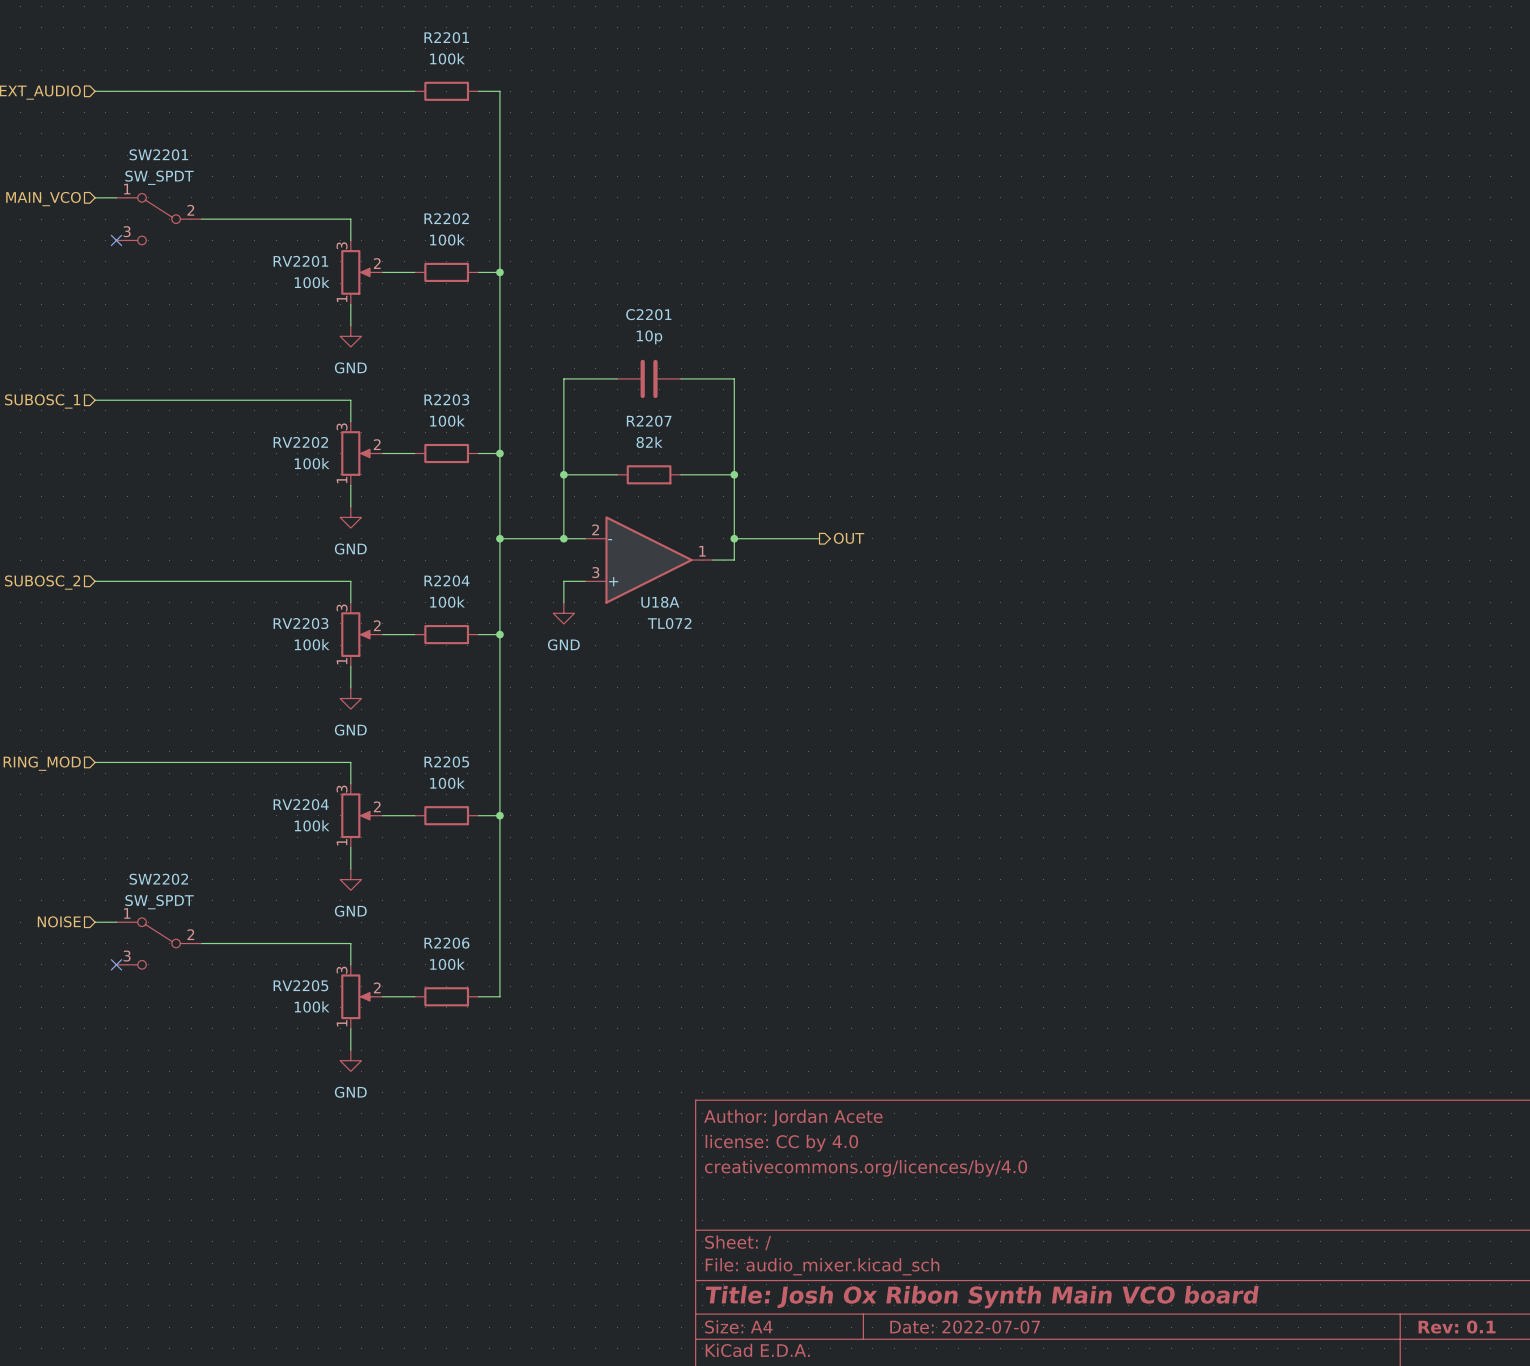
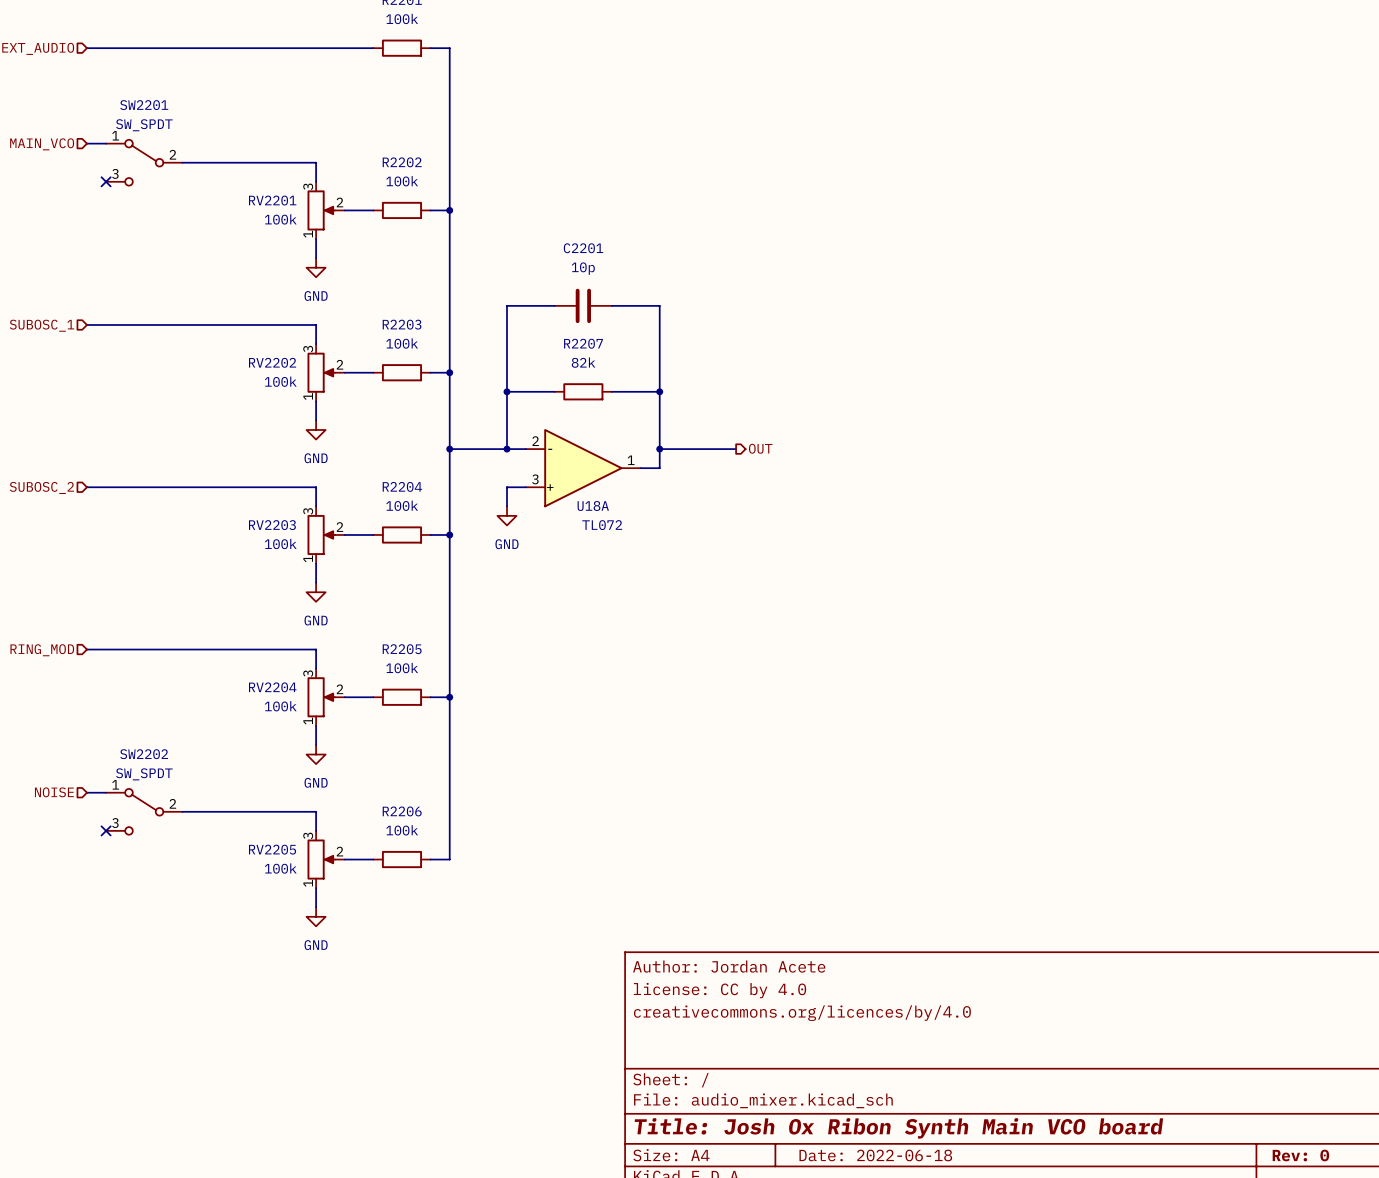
title block: Date: 2022-07-07 (965, 1327) -> Date: 2022-06-18 (875, 1155)
title block: Rev: 0.1 (1457, 1327) -> Rev: 0 (1300, 1155)

